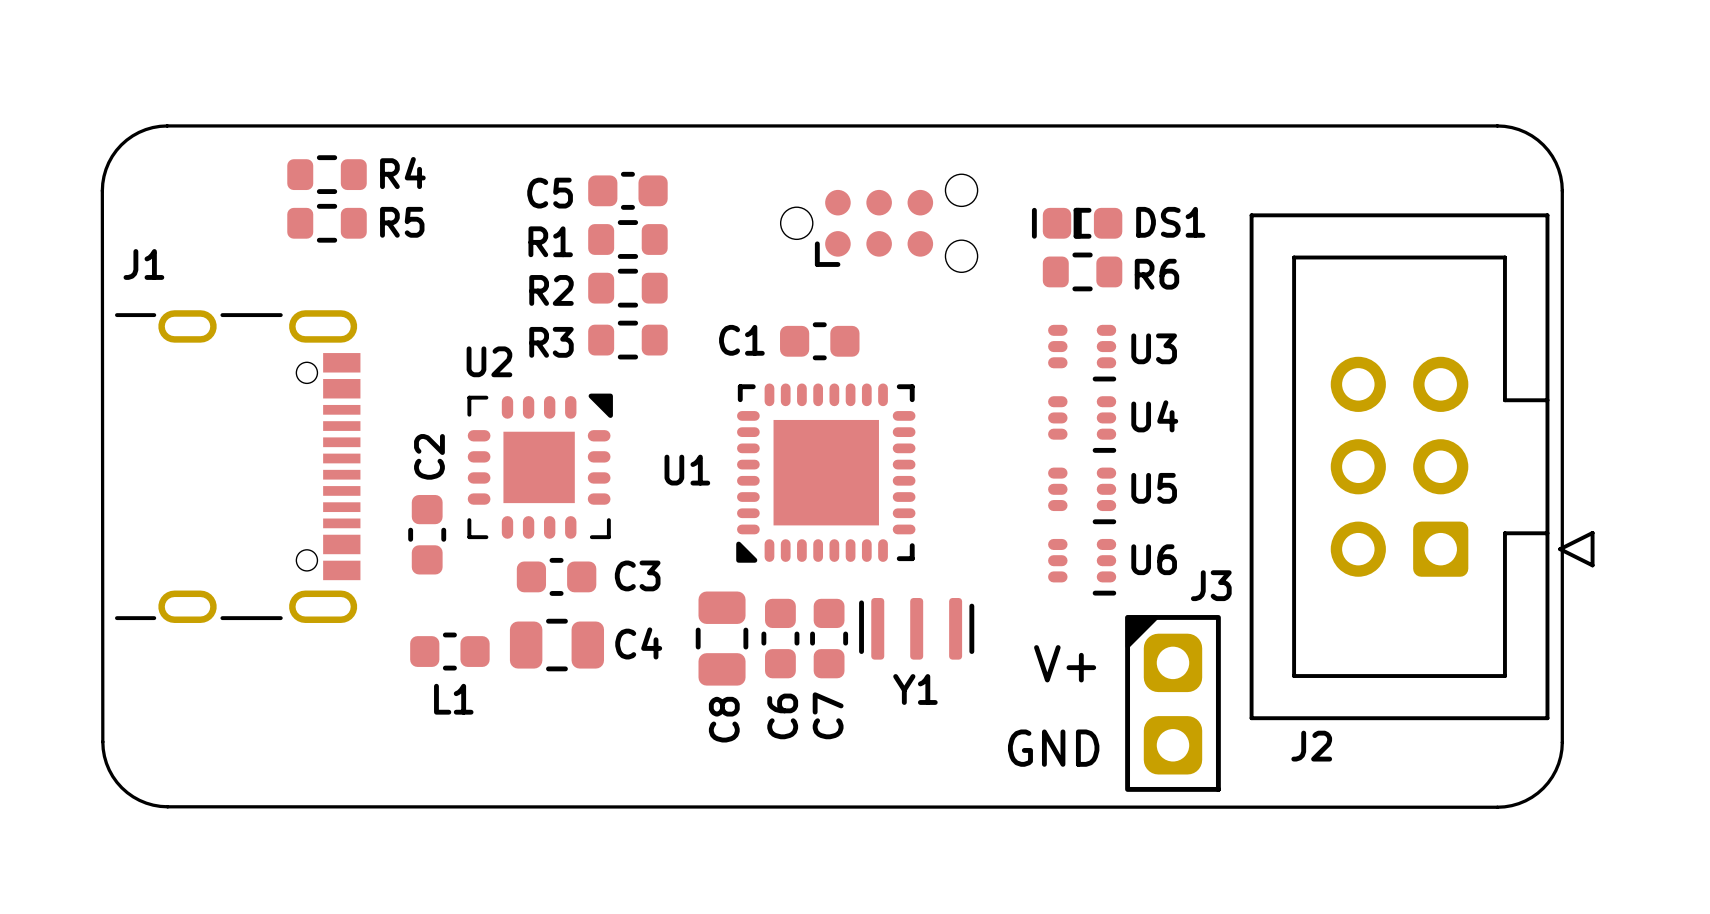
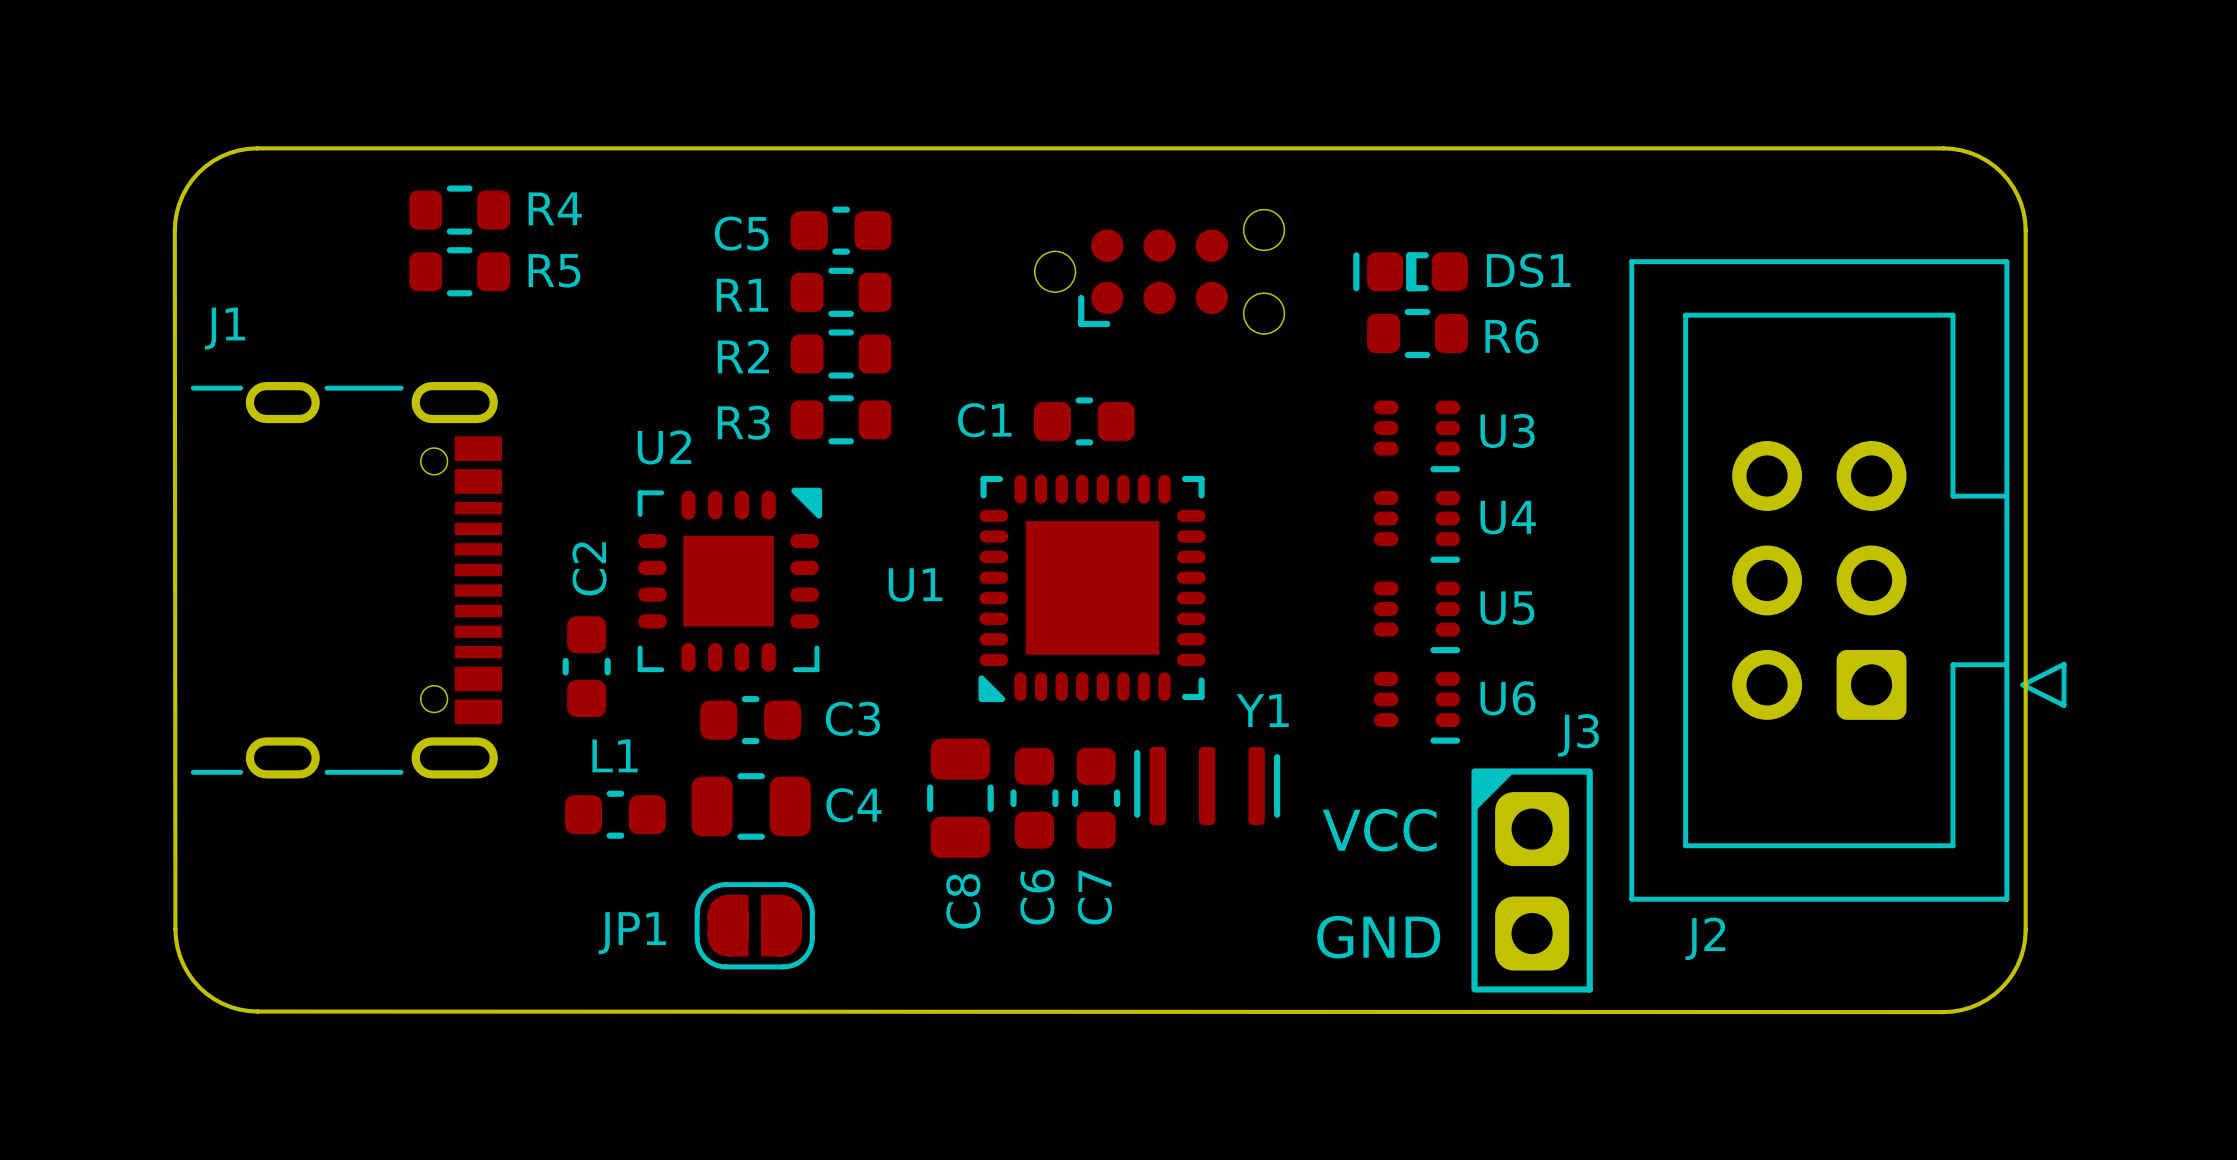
text: V+ (1065, 663) -> VCC (1379, 830)
Y1 name position: Y1 (915, 689) -> Y1 (1262, 710)
L1 name position: L1 (453, 699) -> L1 (615, 755)
JP1: none -> (754, 925)

